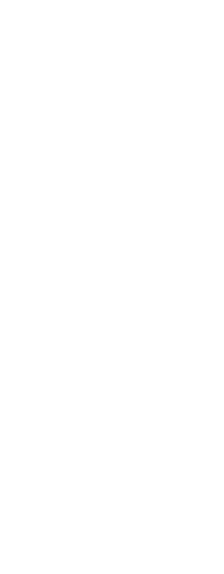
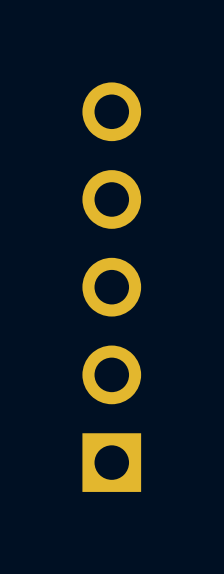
part: none -> (111, 287)

